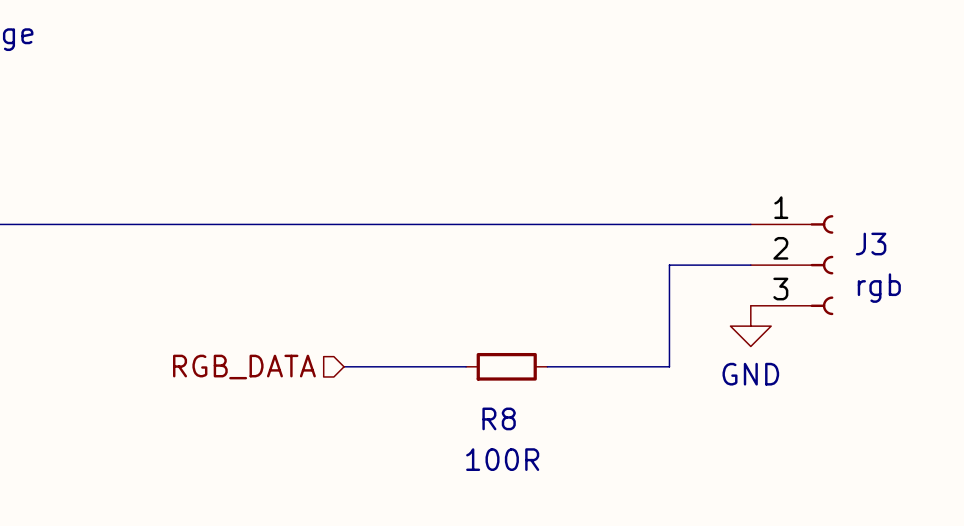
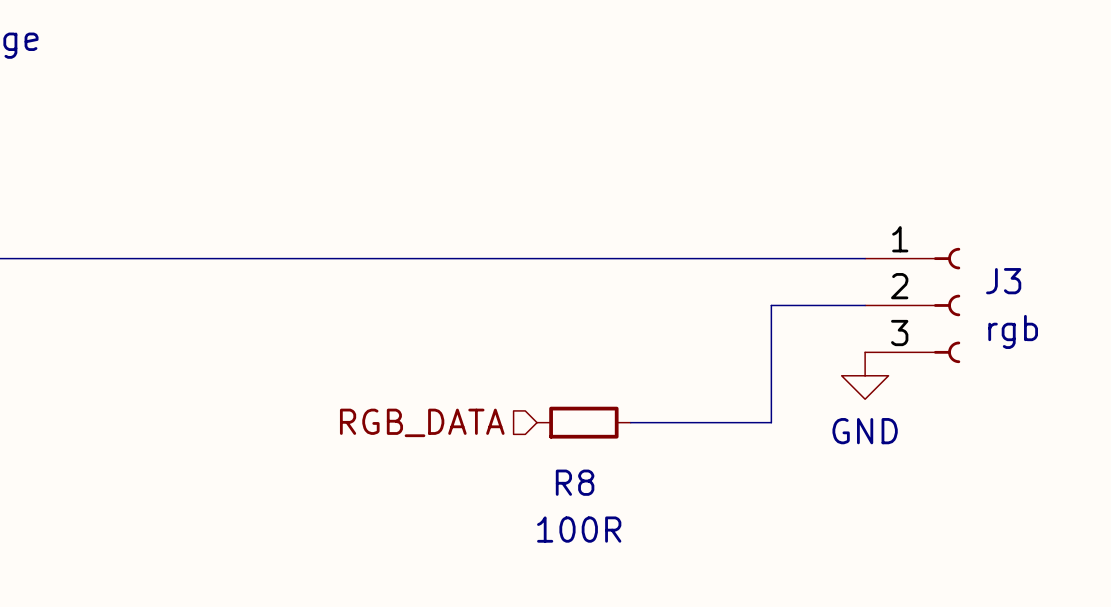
wire: (344, 366) (466, 366) -> none
hierarchical label position: RGB_DATA (244, 367) -> RGB_DATA (422, 422)

